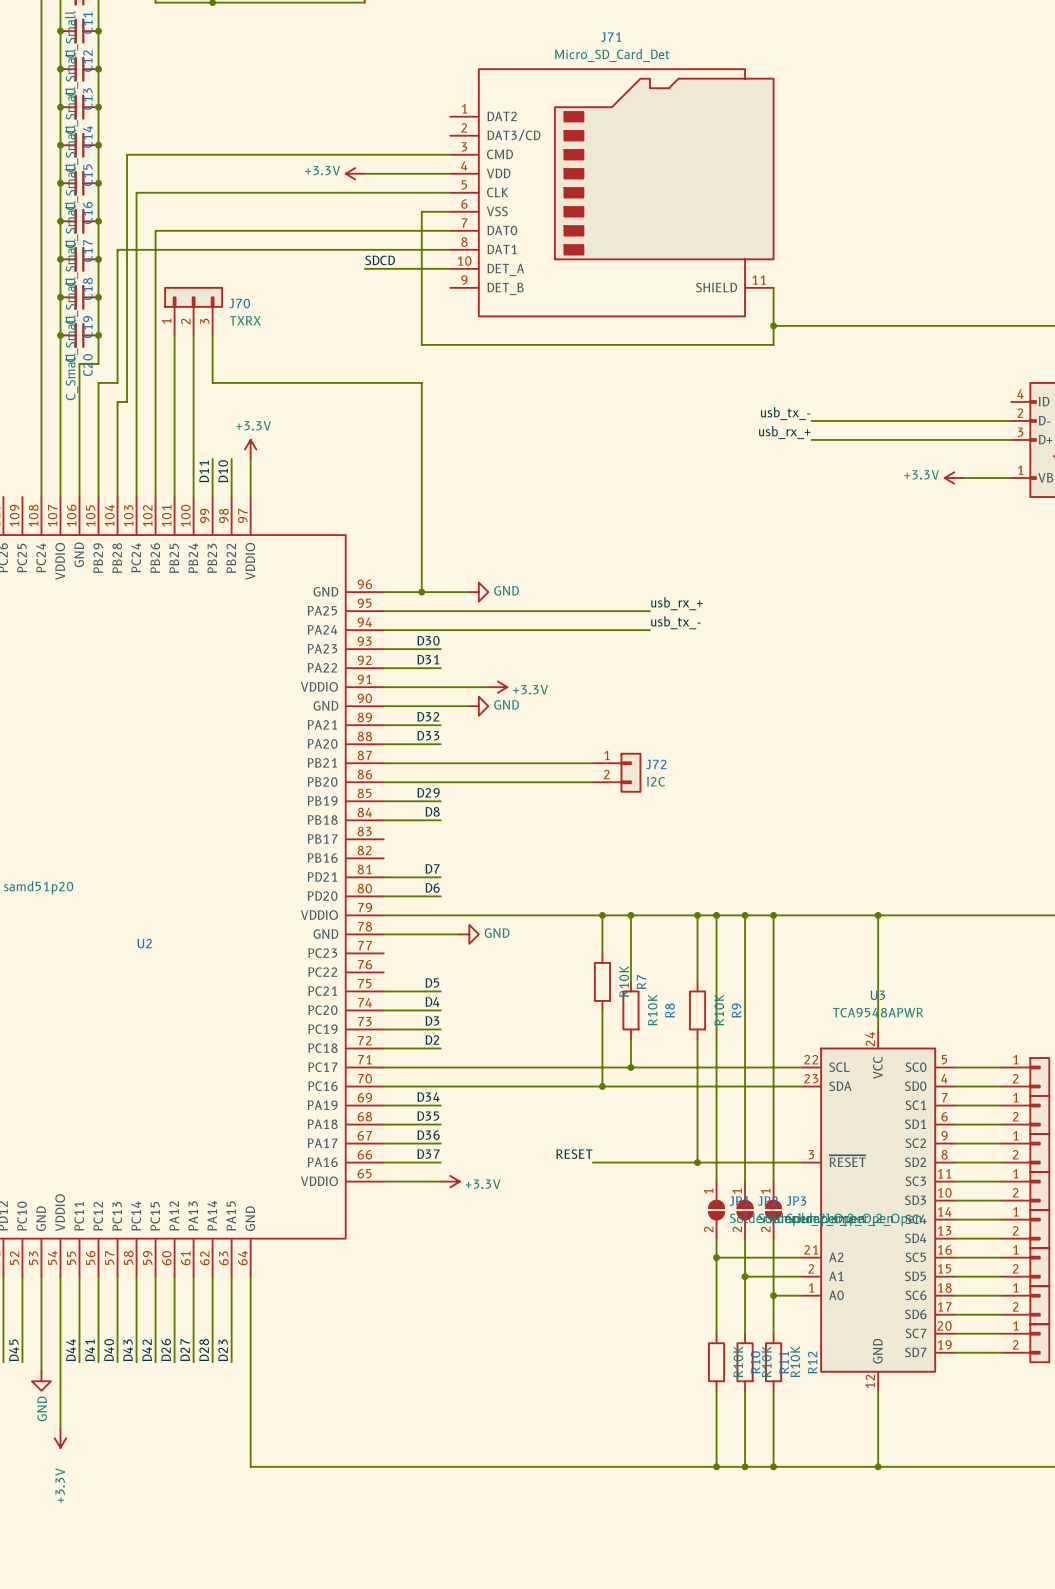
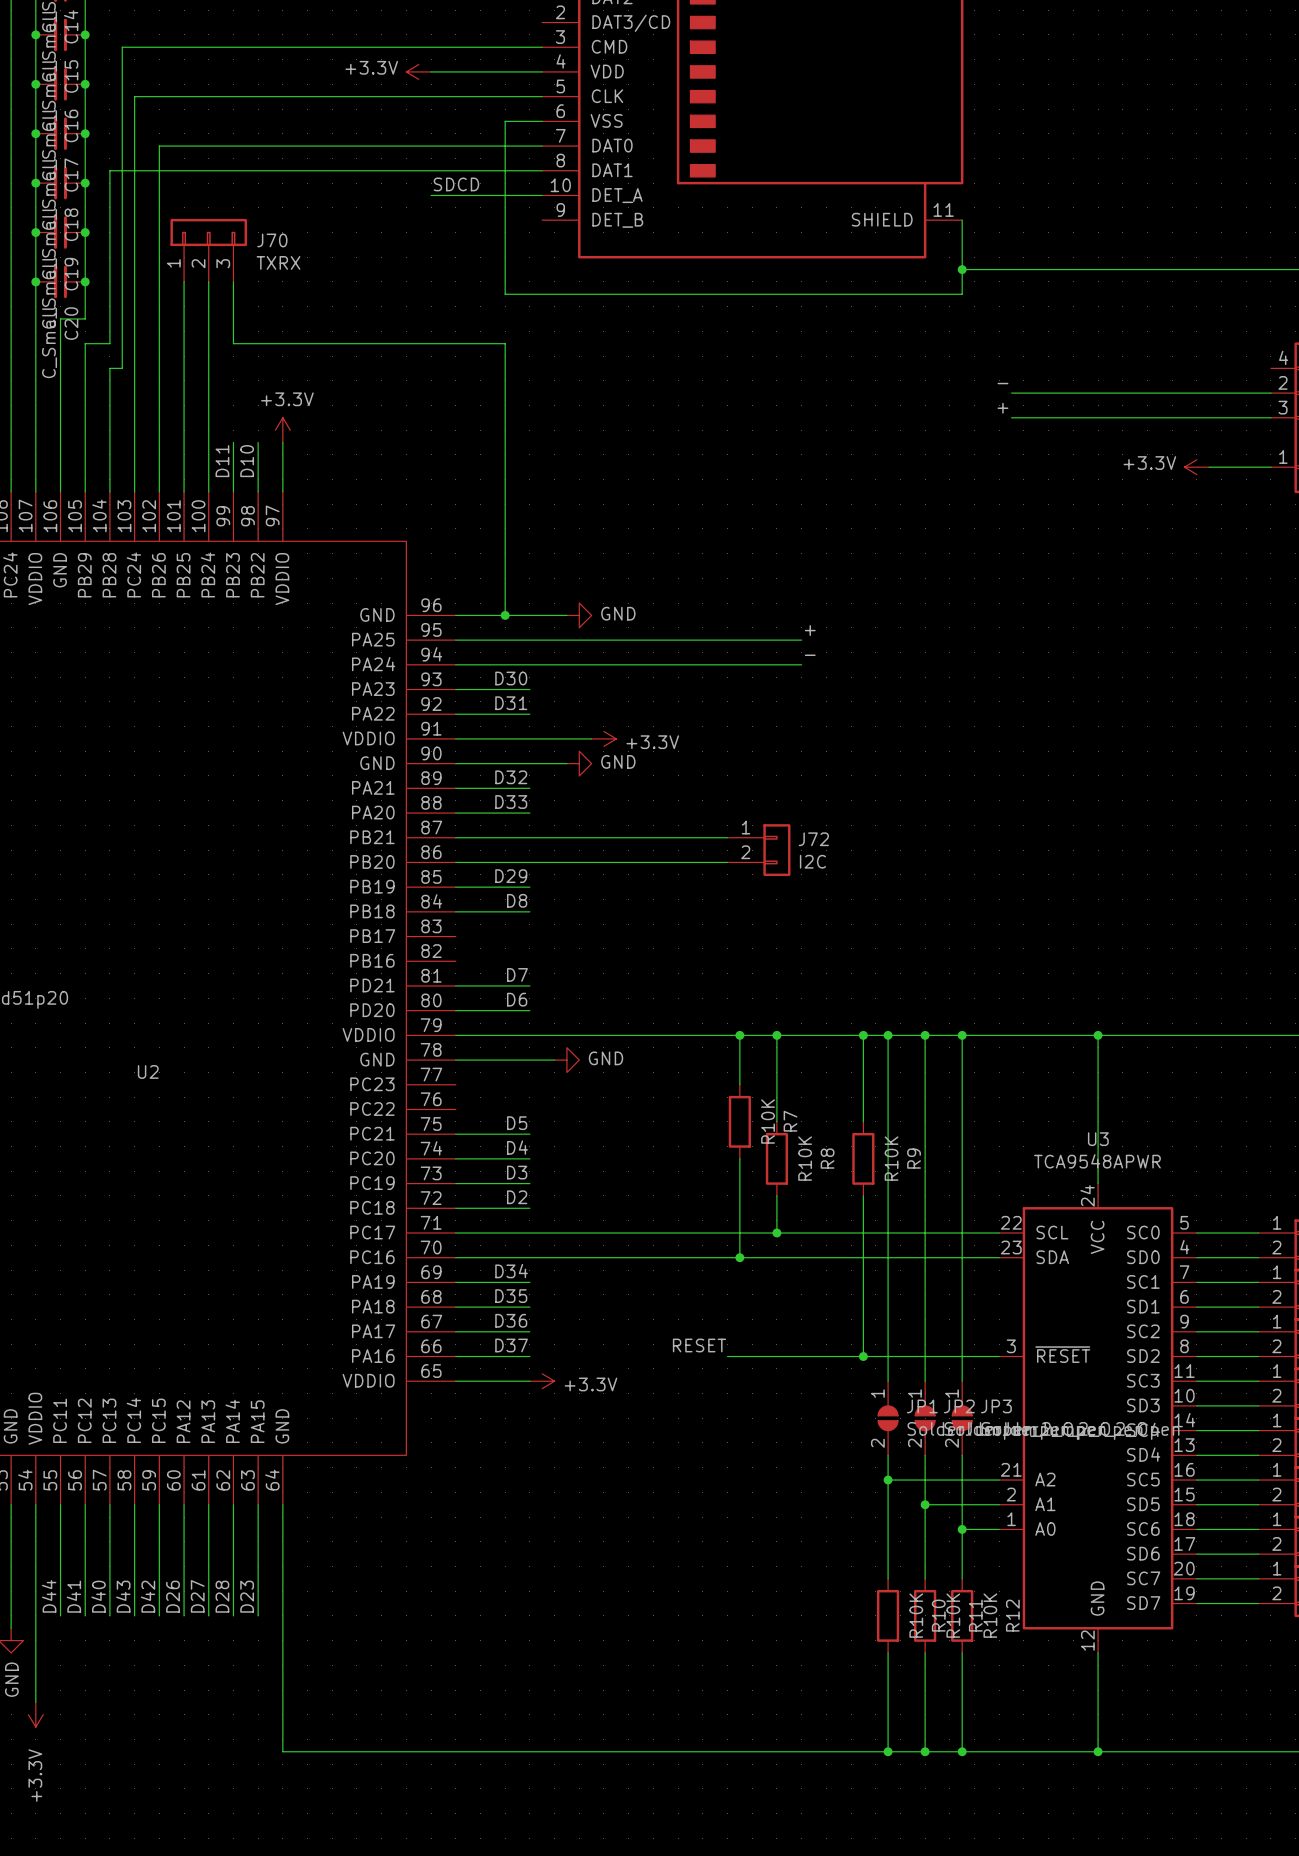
label: usb_tx_- (785, 413) -> - (1002, 383)
label: usb_rx_+ (784, 432) -> + (1002, 408)
label: usb_rx_+ (676, 603) -> + (810, 630)
label: usb_tx_- (675, 622) -> - (810, 655)

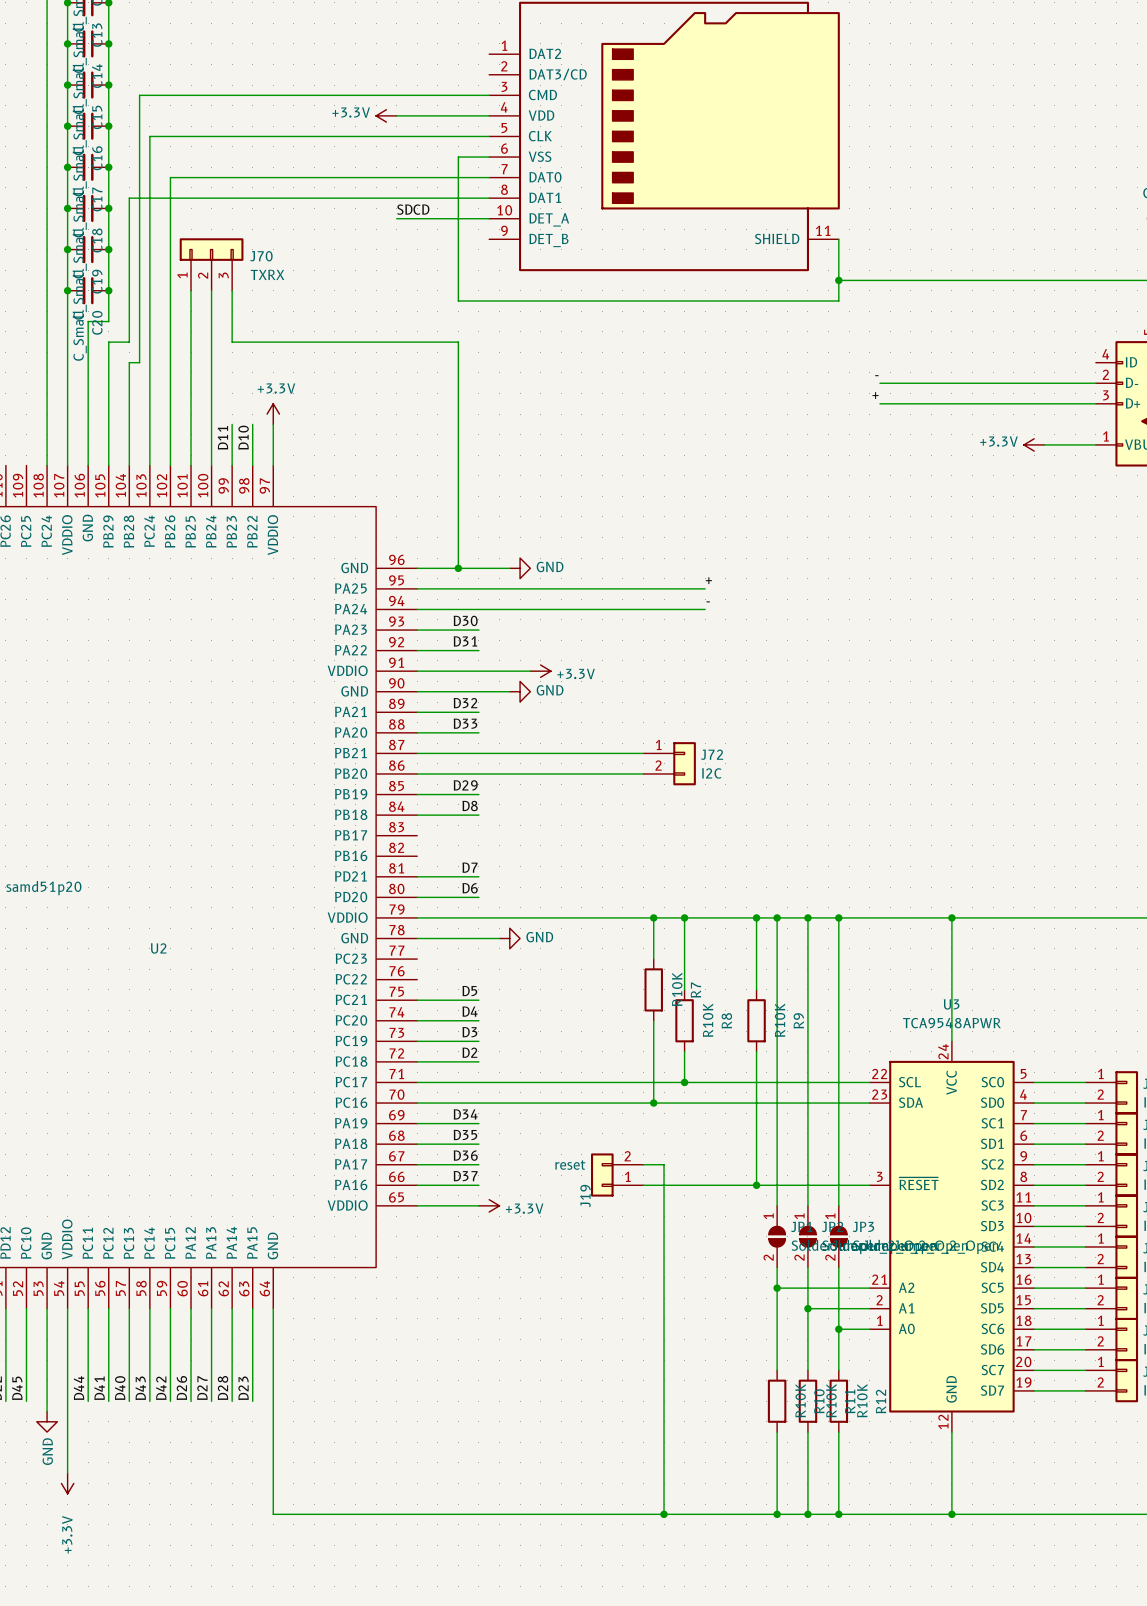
wire: none -> (643, 1164) (664, 1164) (664, 1514)
J19: none -> reset (617, 1175)
label: RESET (699, 1345) -> none
junction: none -> (664, 1514)

